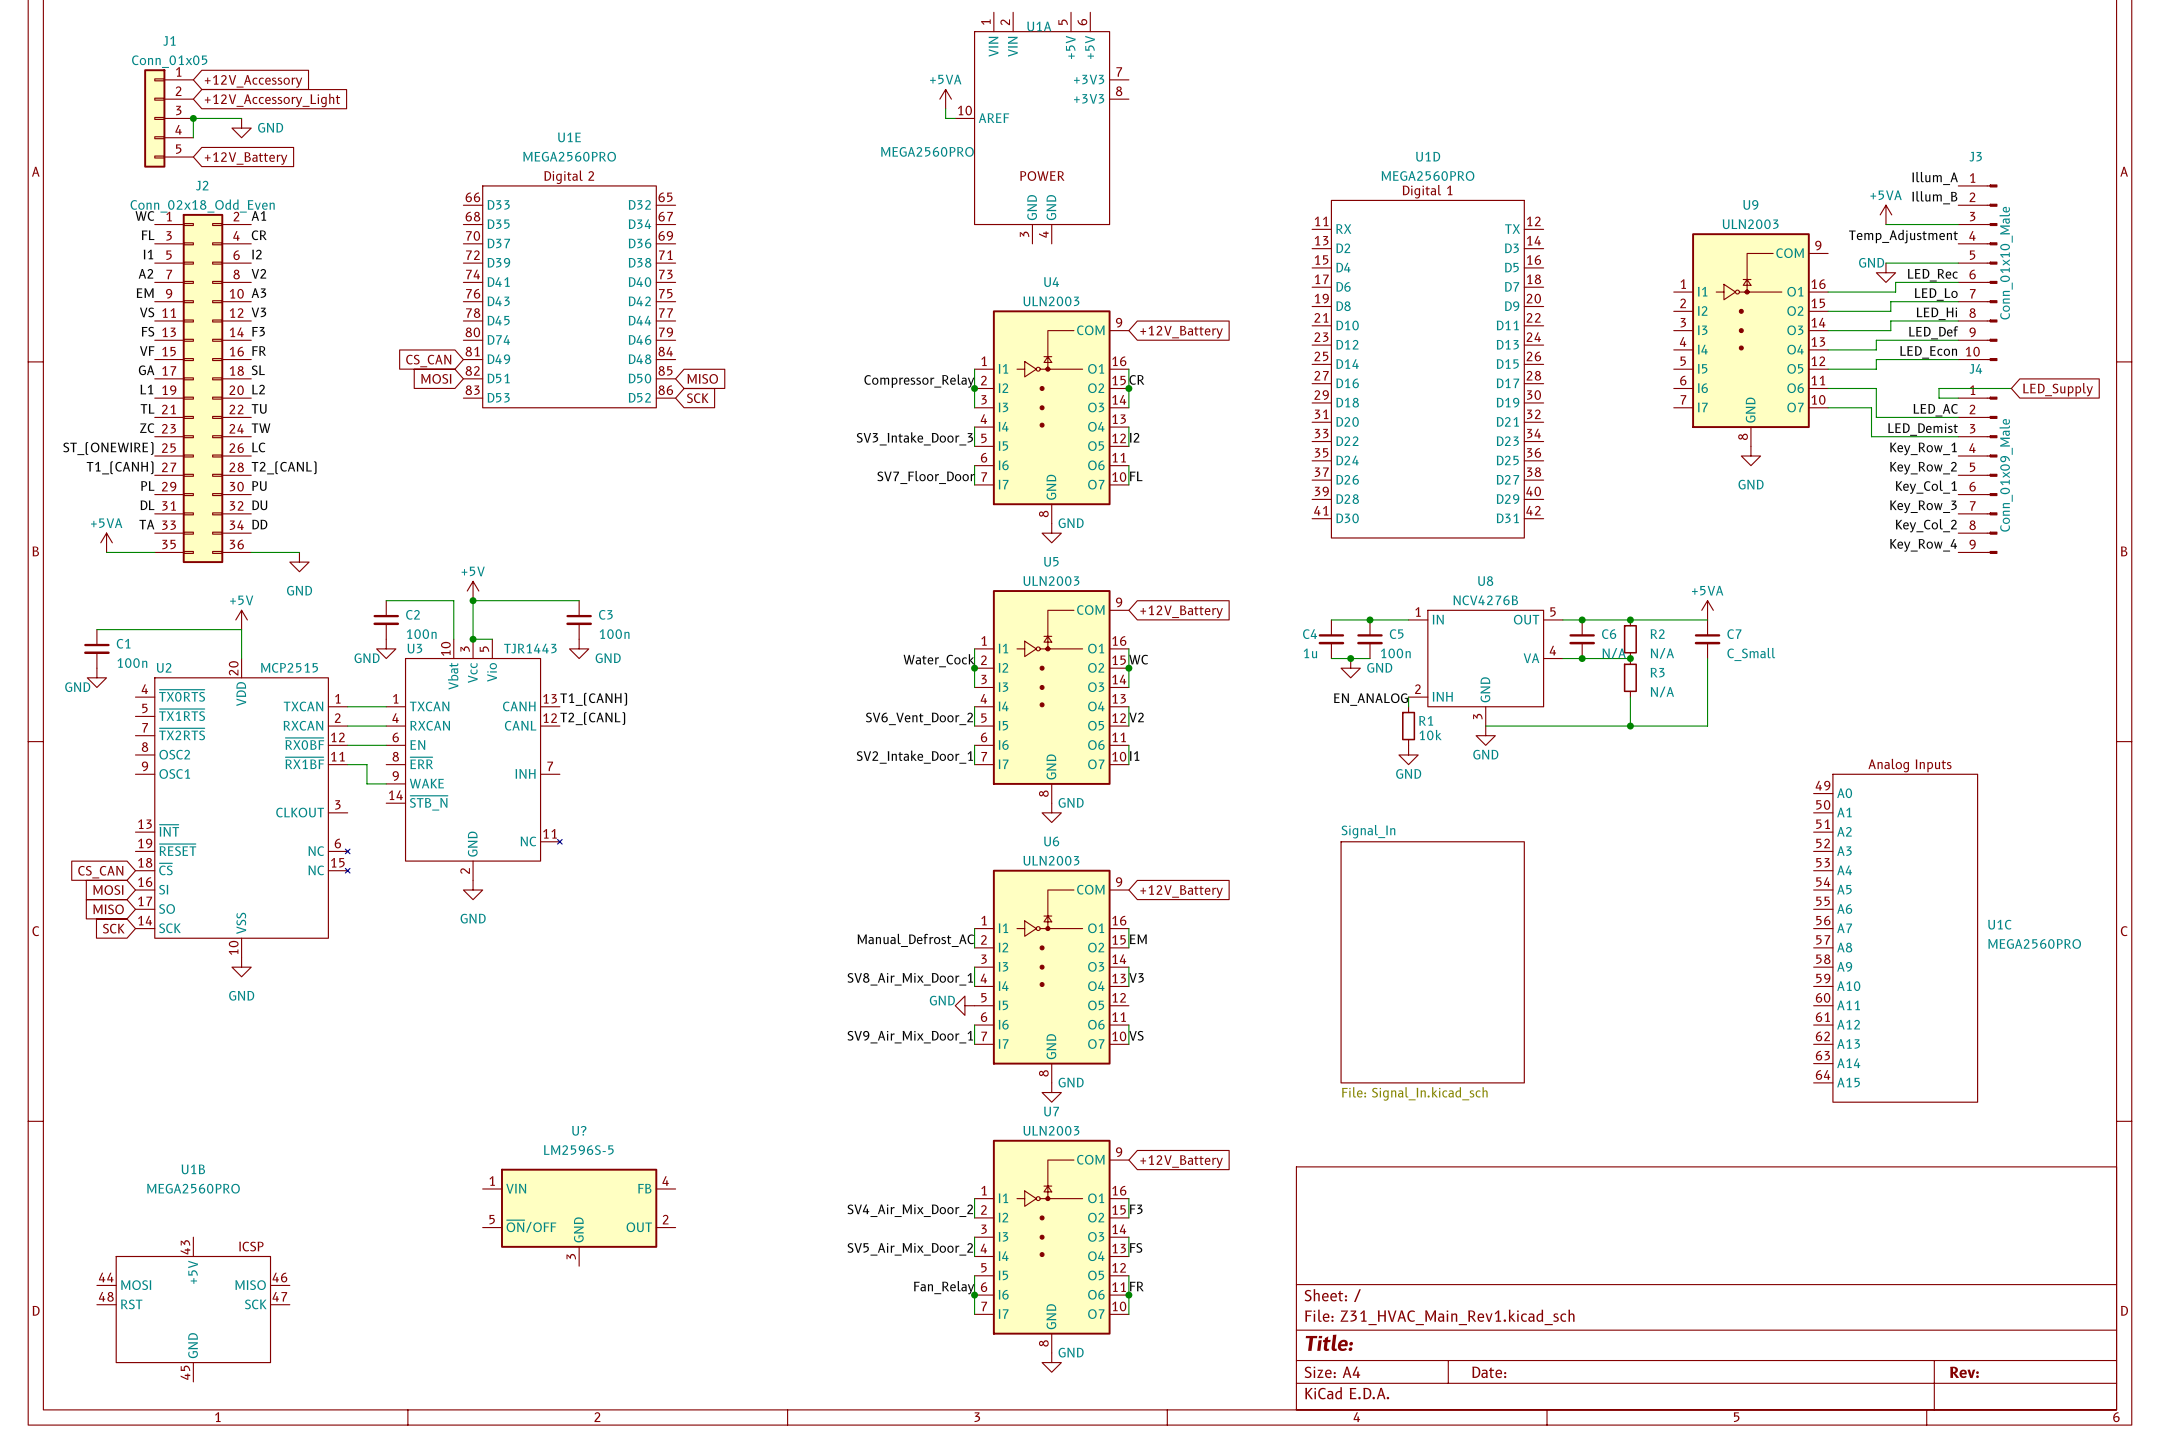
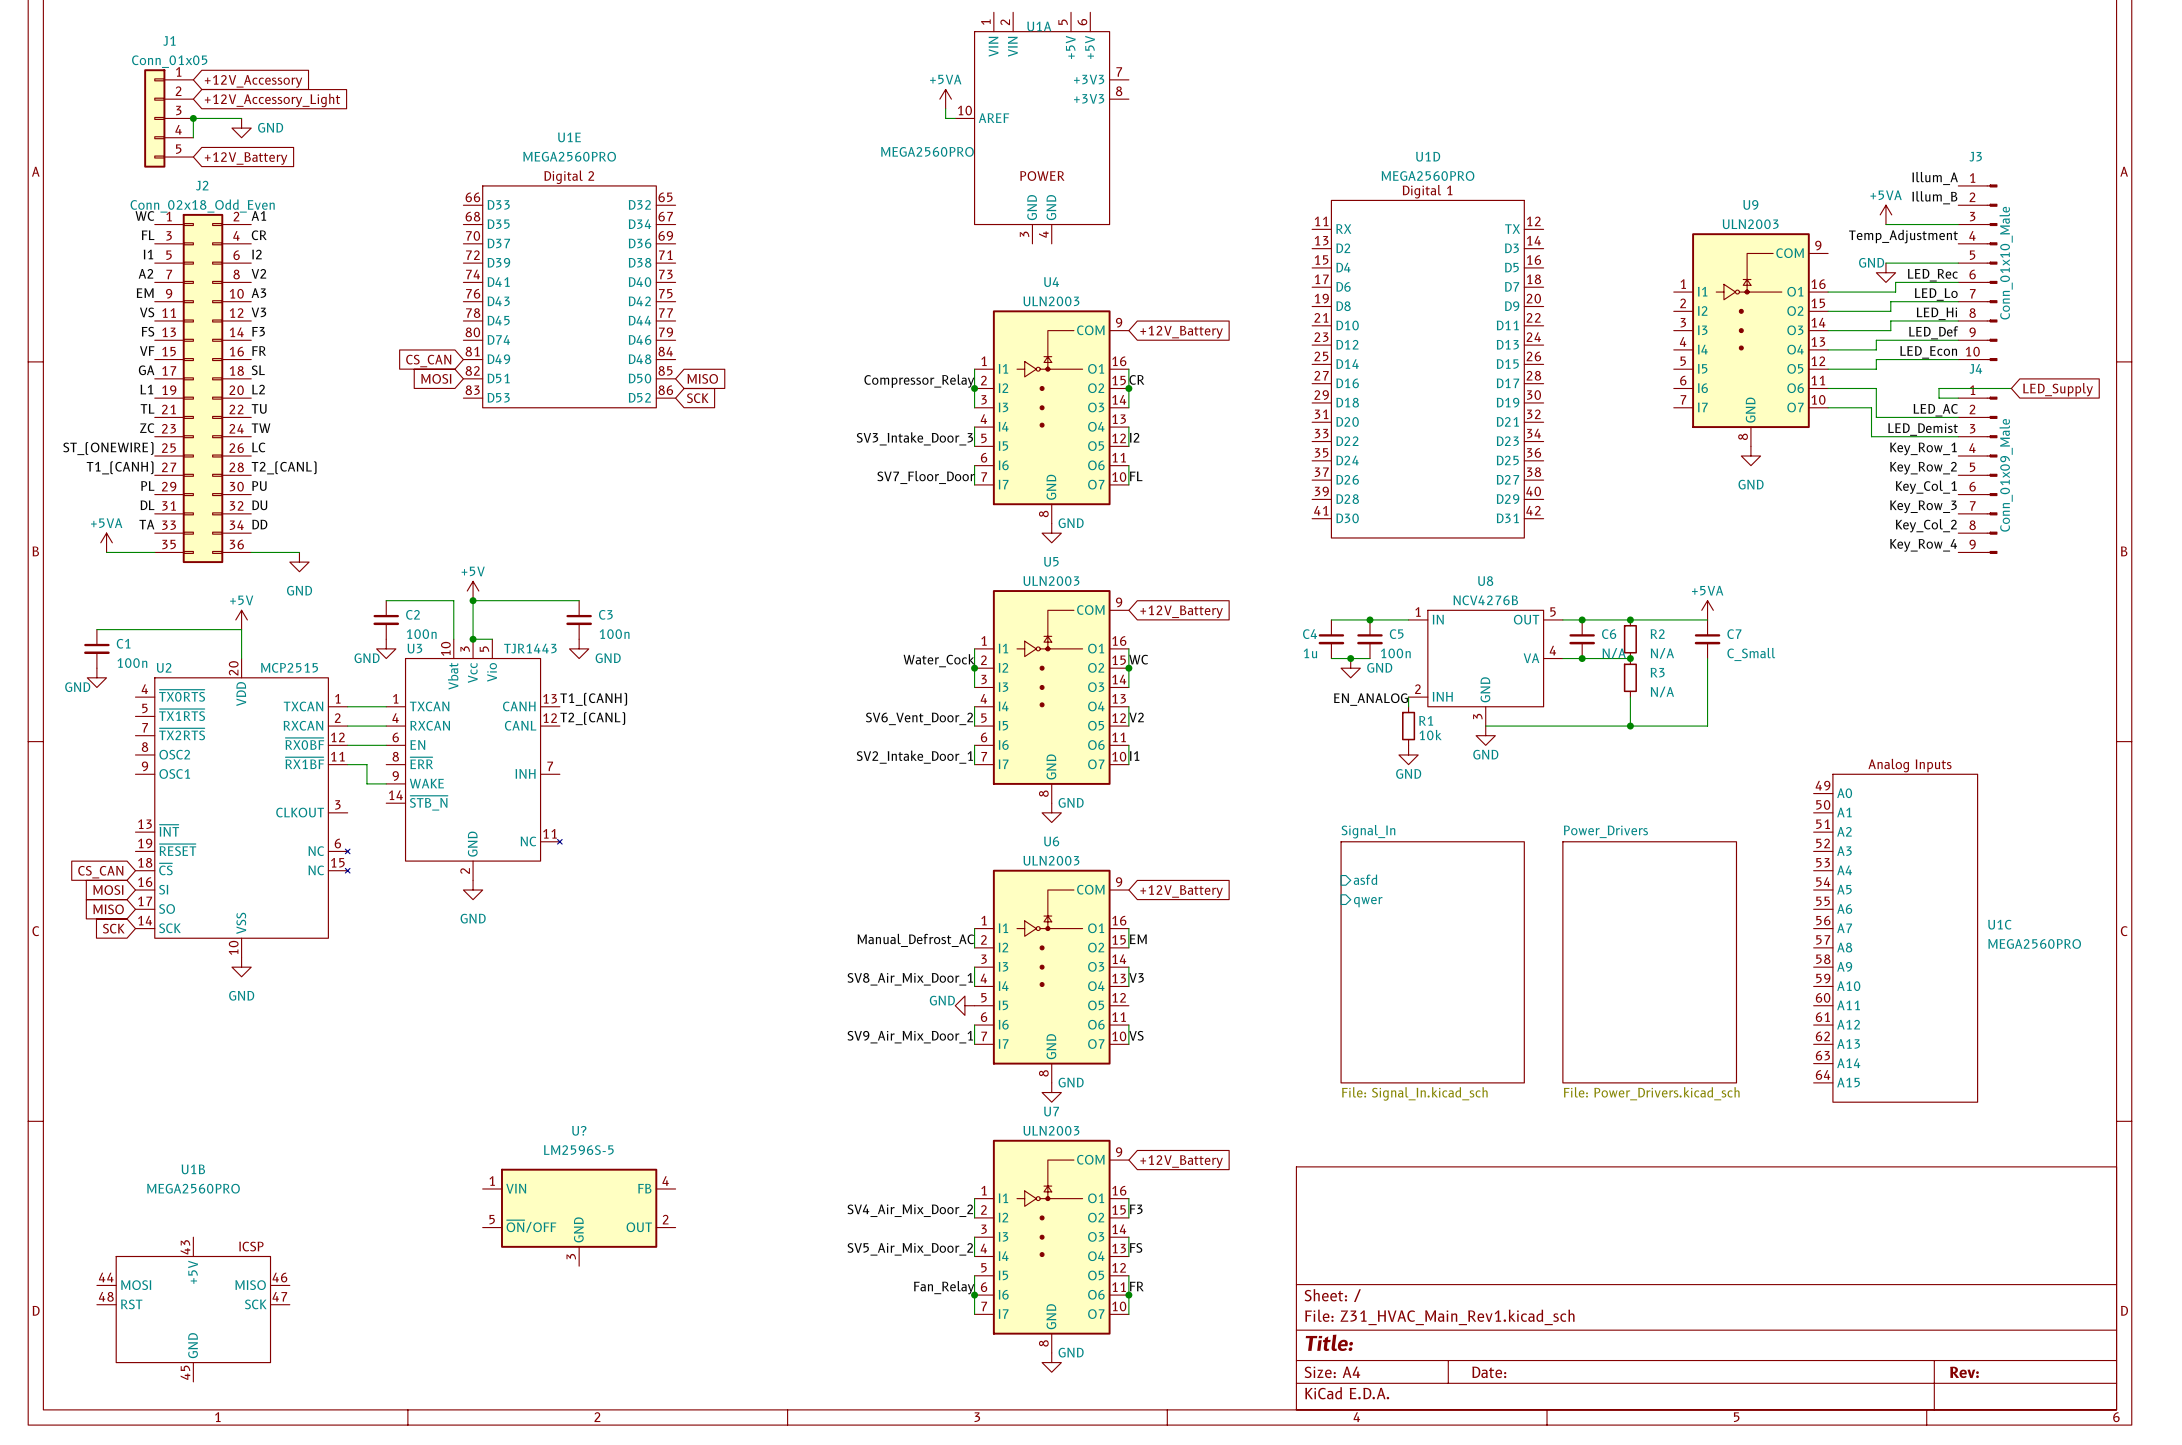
sheet pin: none -> asfd (1365, 879)
sheet pin: none -> qwer (1368, 902)
sheet Power_Drivers: none -> File: Power_Drivers.kicad_sch (1649, 962)

